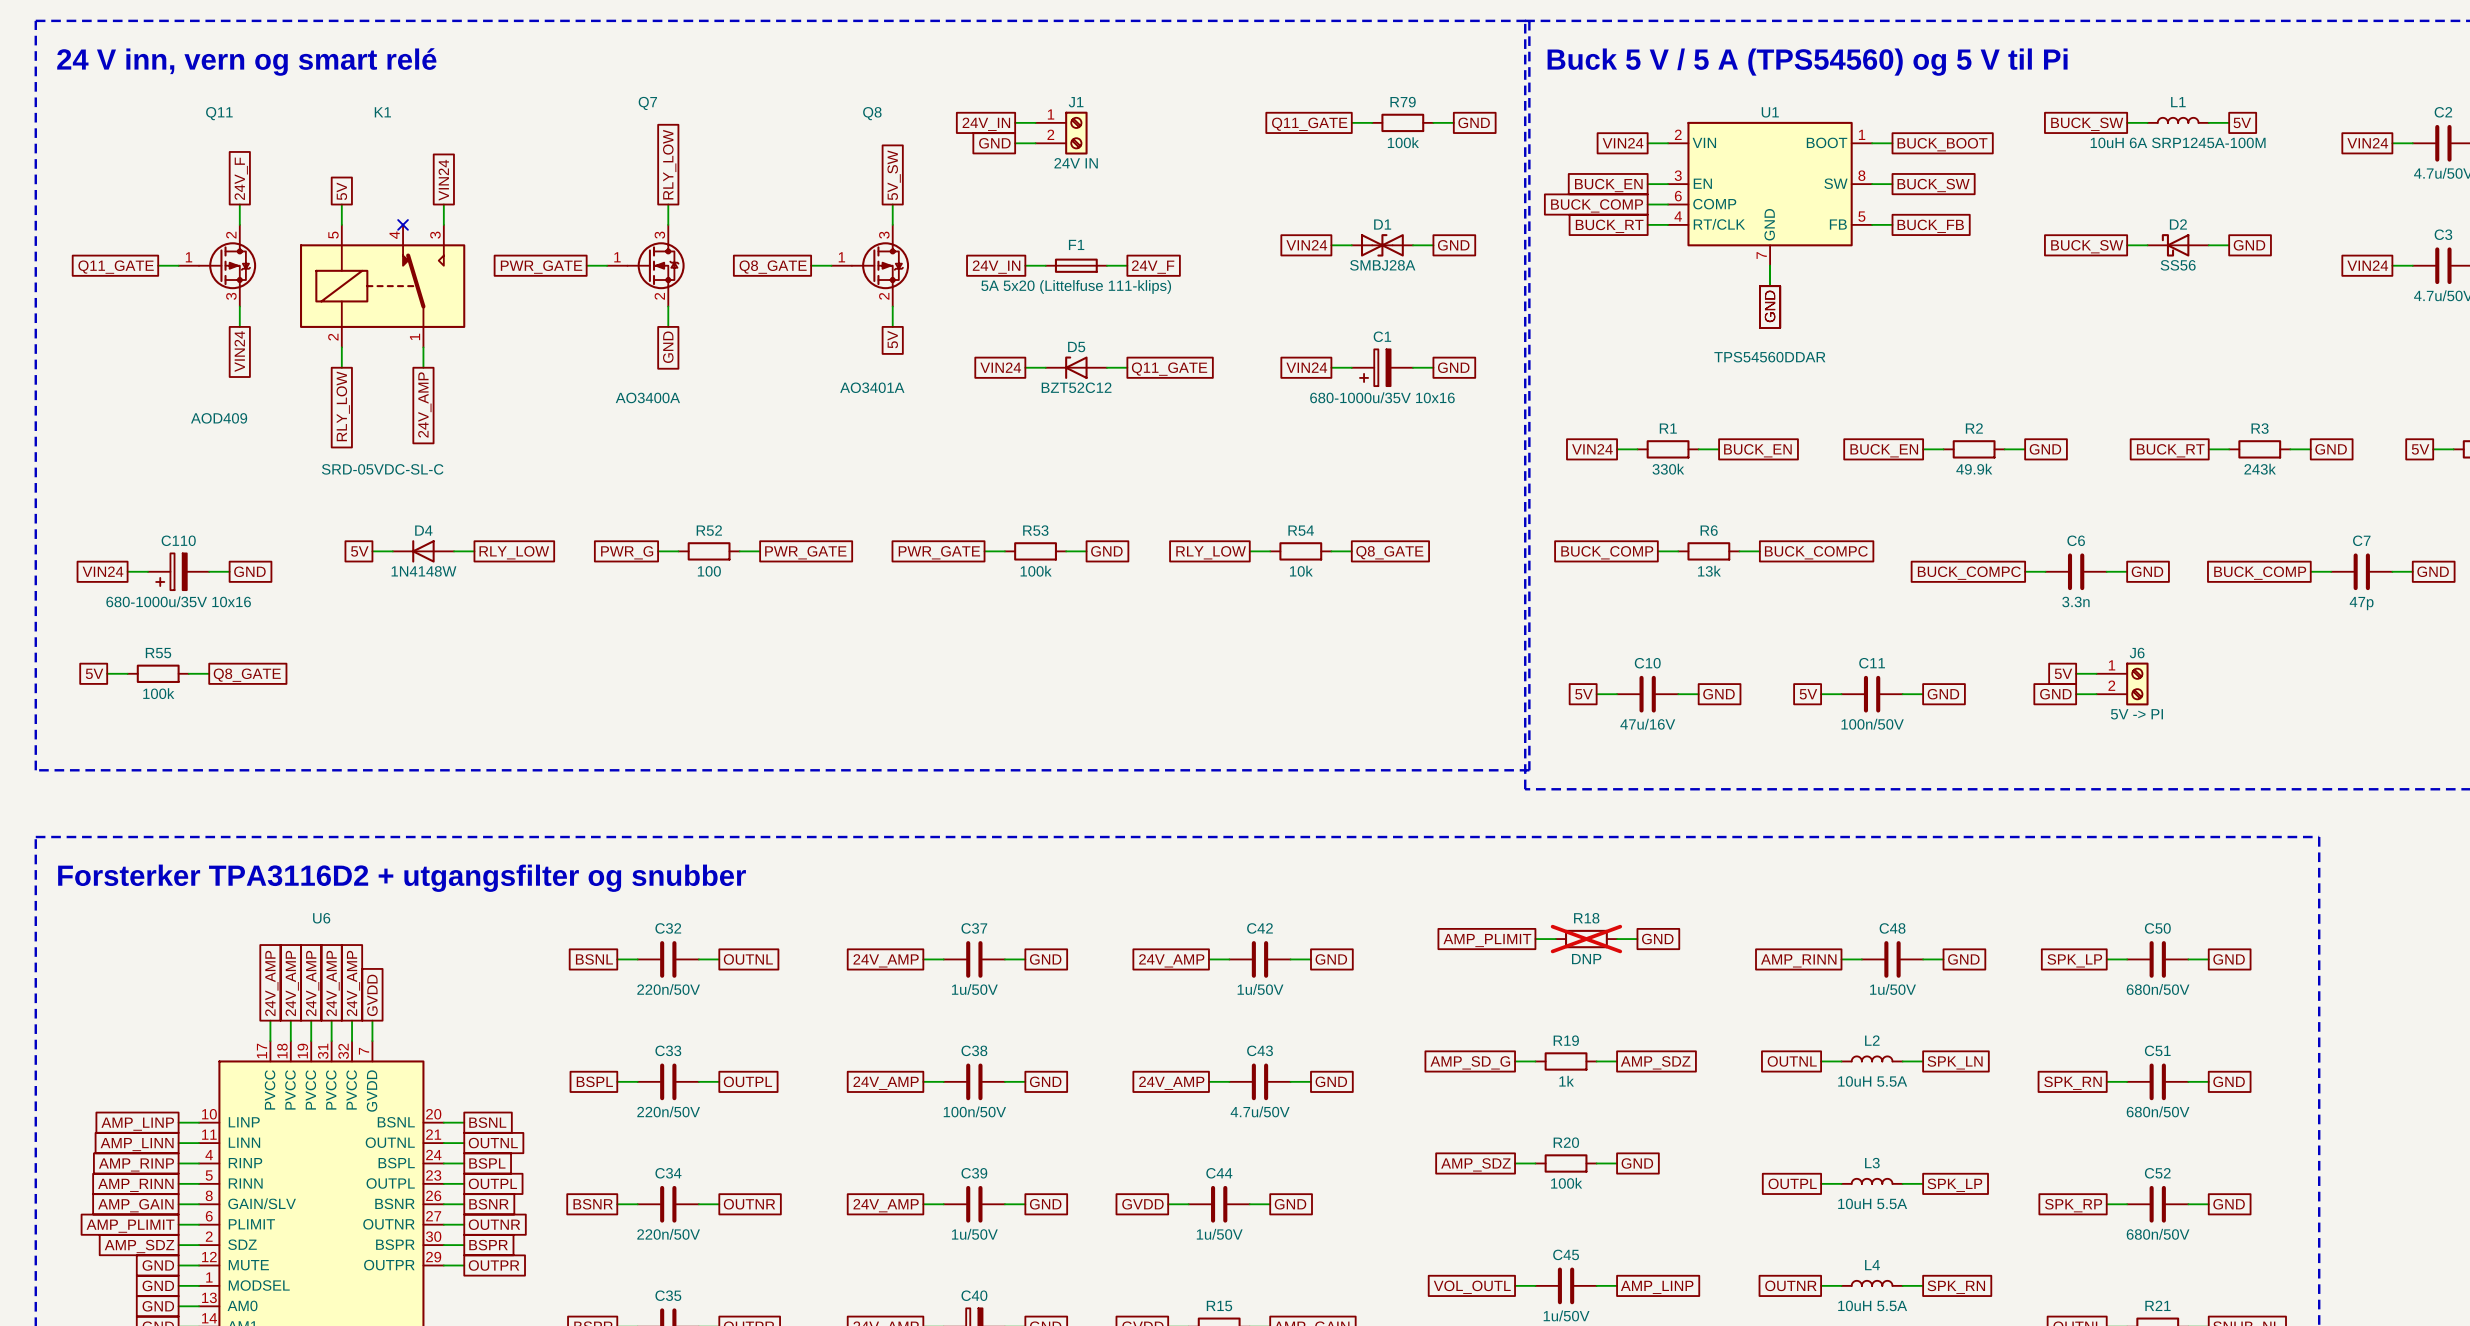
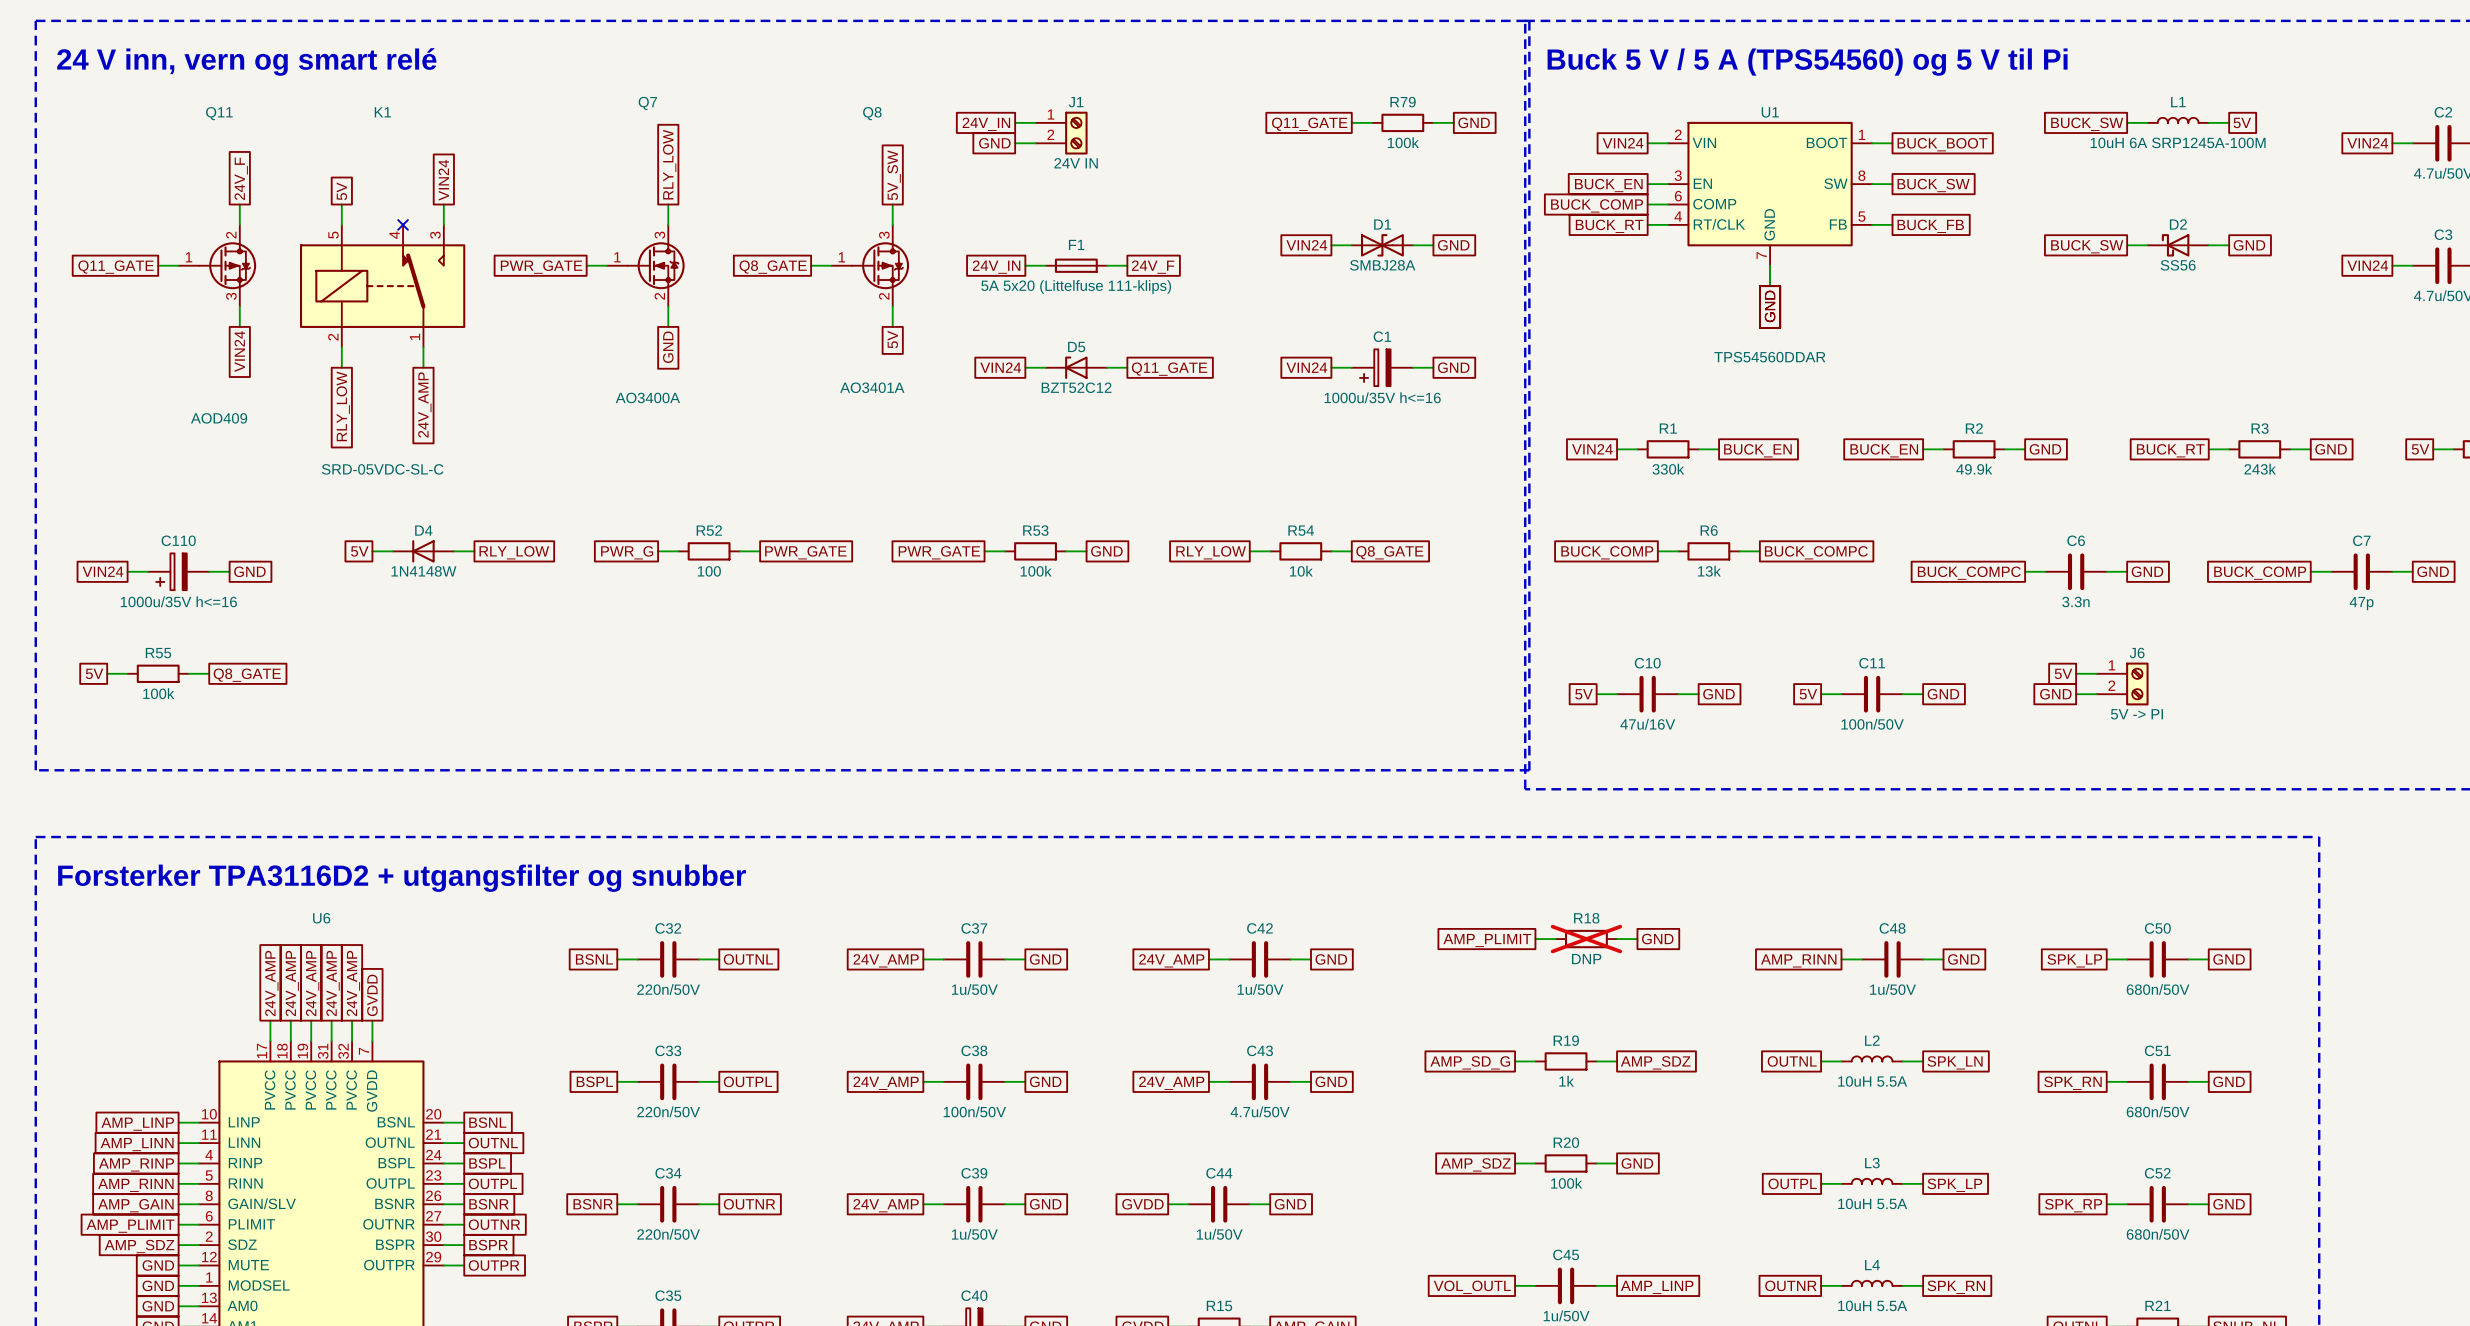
C1 value: 680-1000u/35V 10x16 (1382, 397) -> 1000u/35V h<=16 (1382, 397)
C110 value: 680-1000u/35V 10x16 (178, 601) -> 1000u/35V h<=16 (178, 601)

